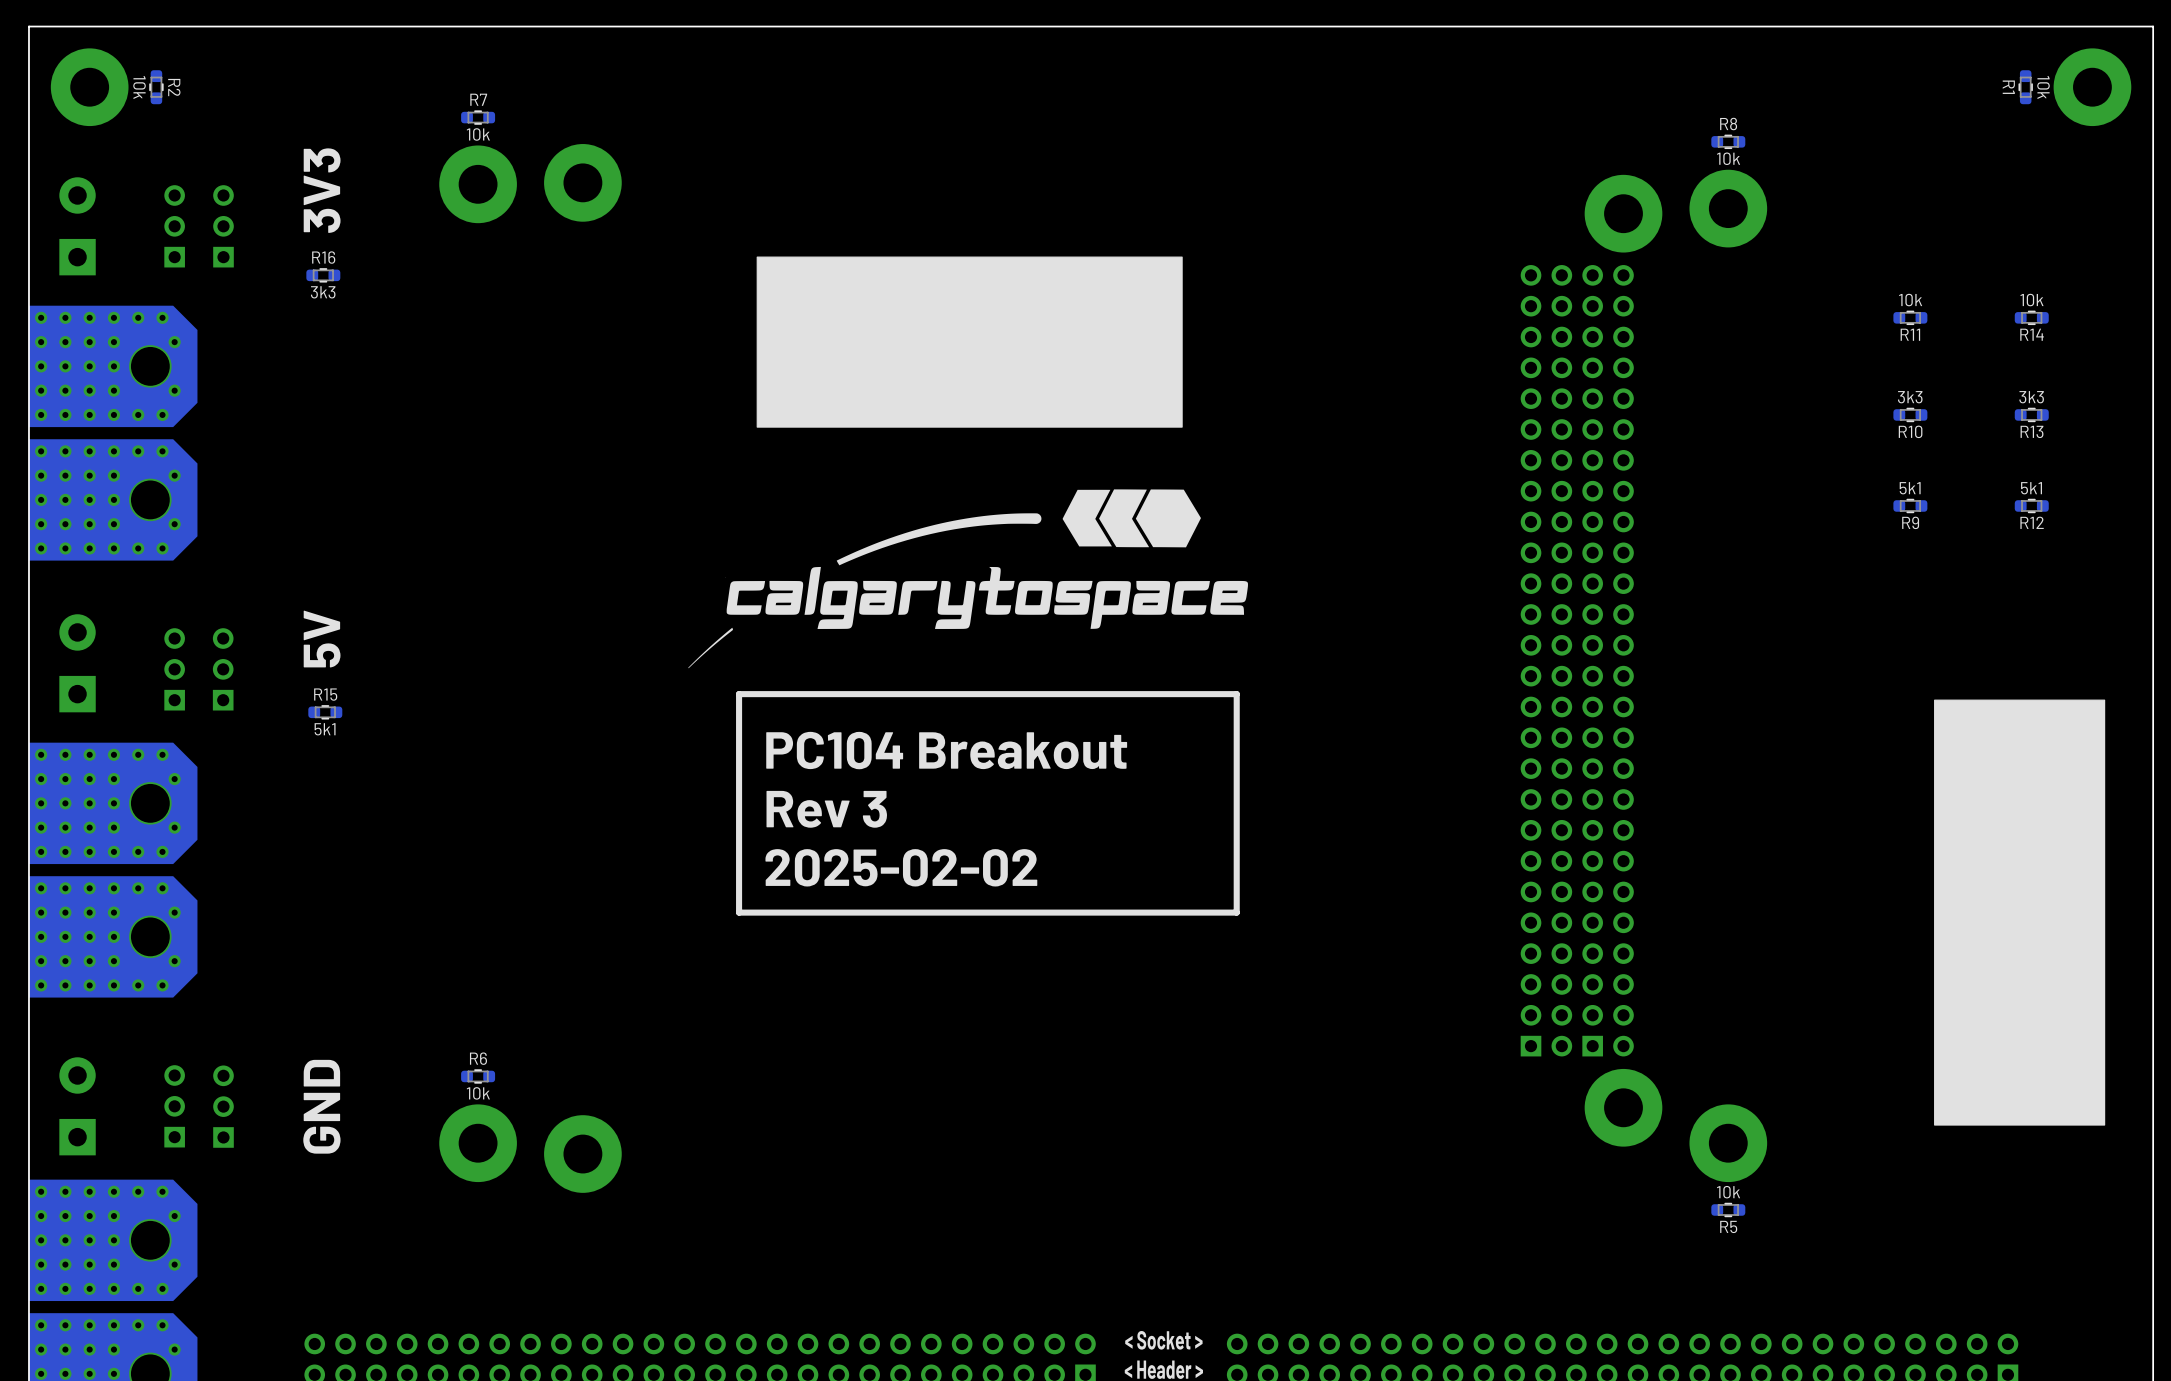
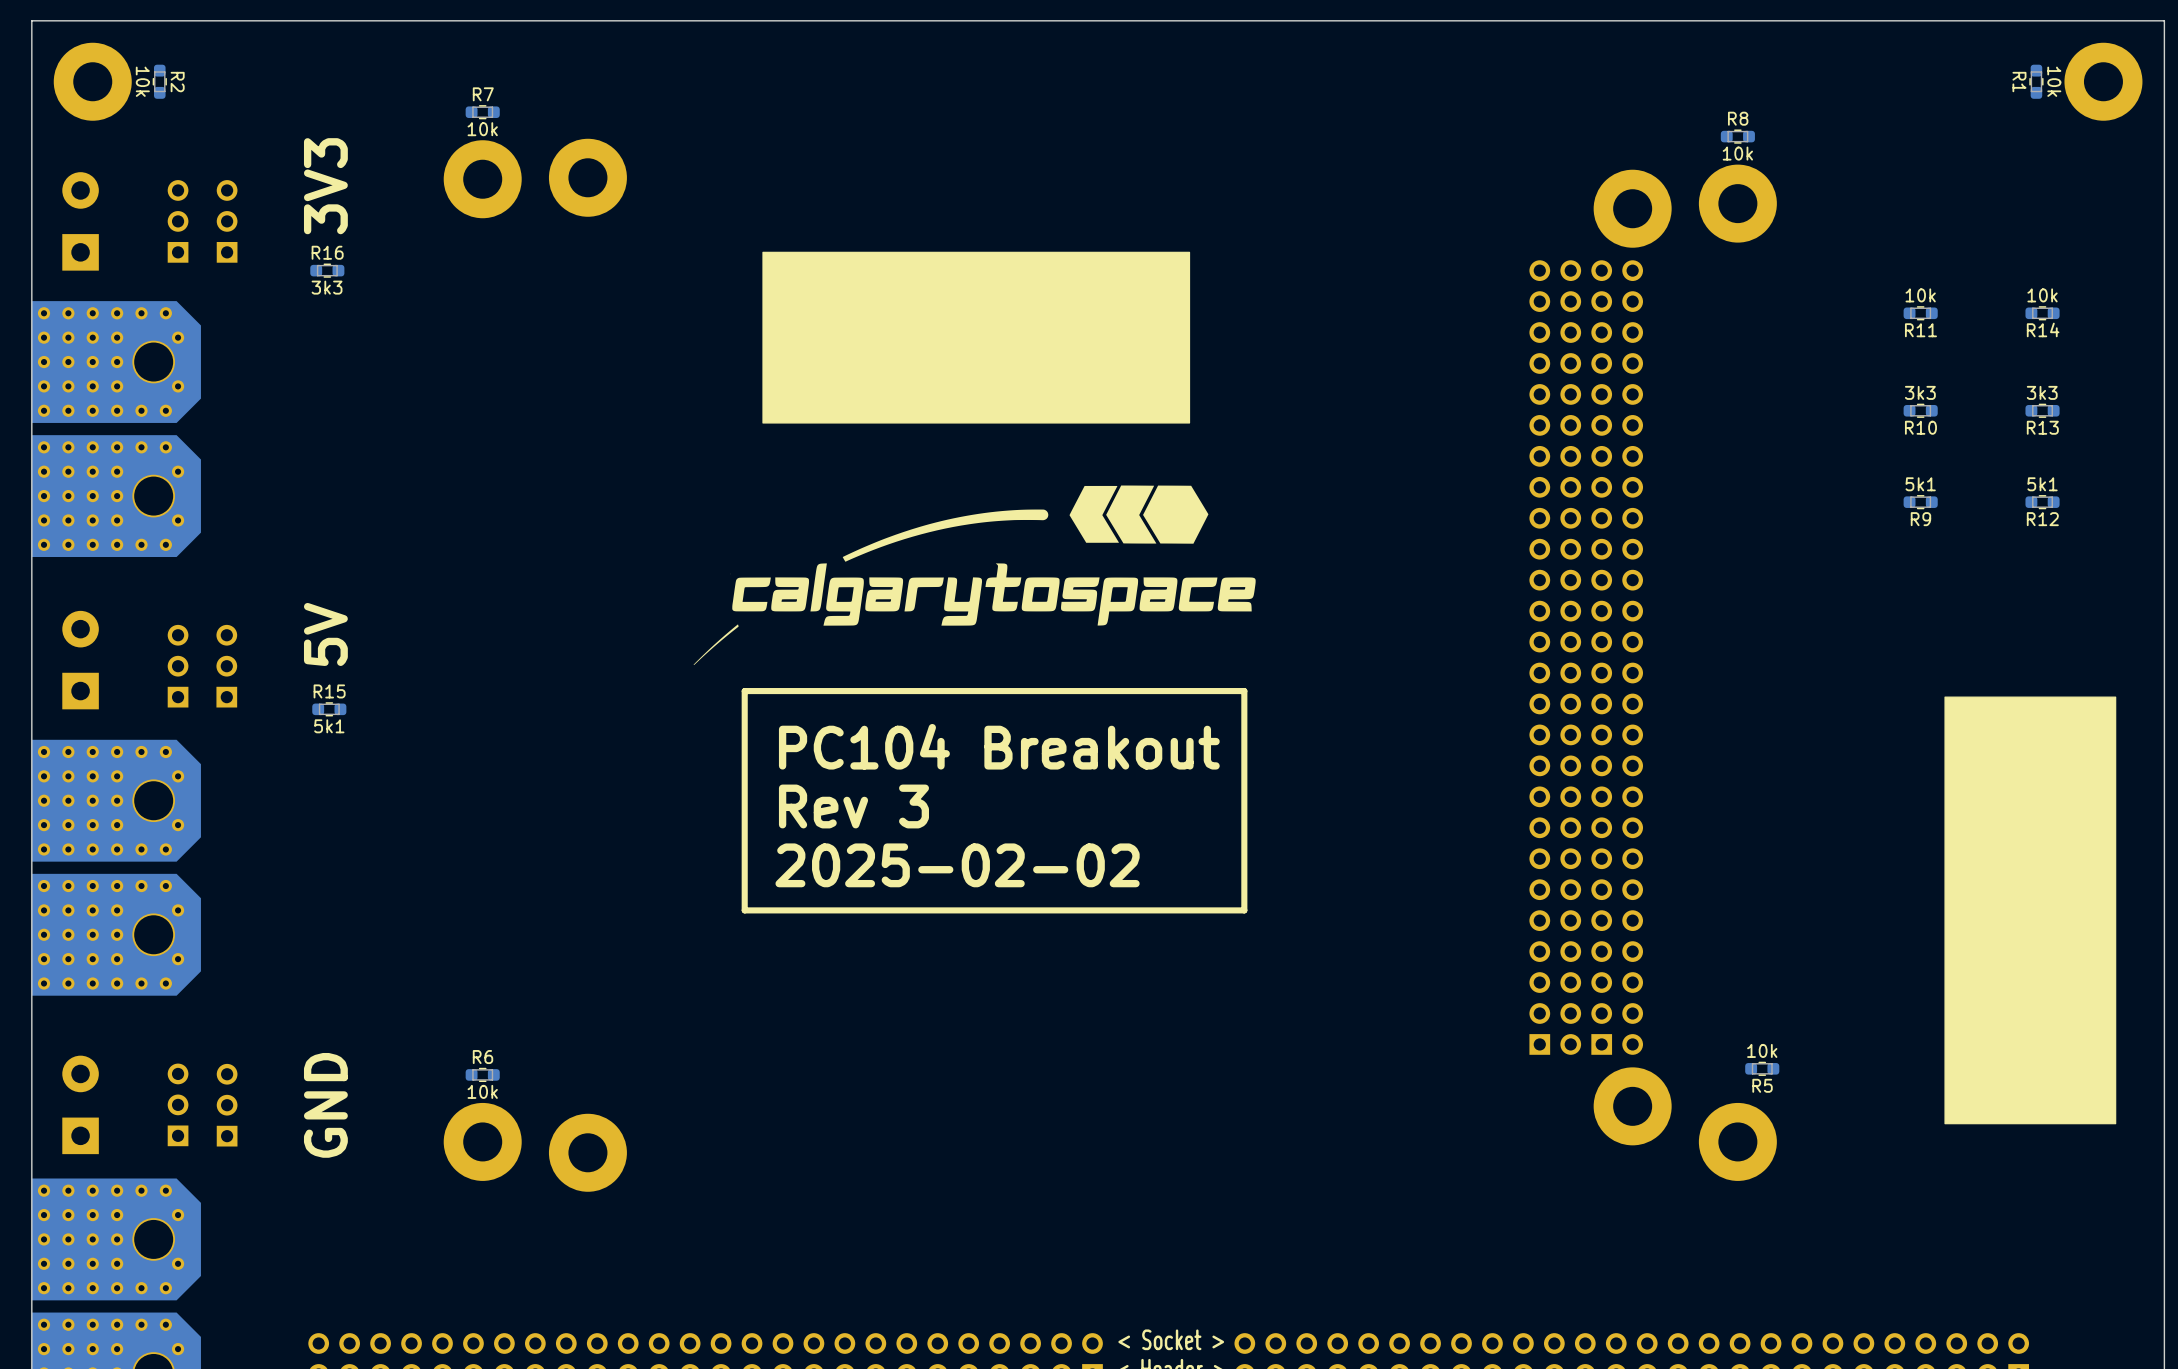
R5 position: (1728, 1209) -> (1762, 1068)

